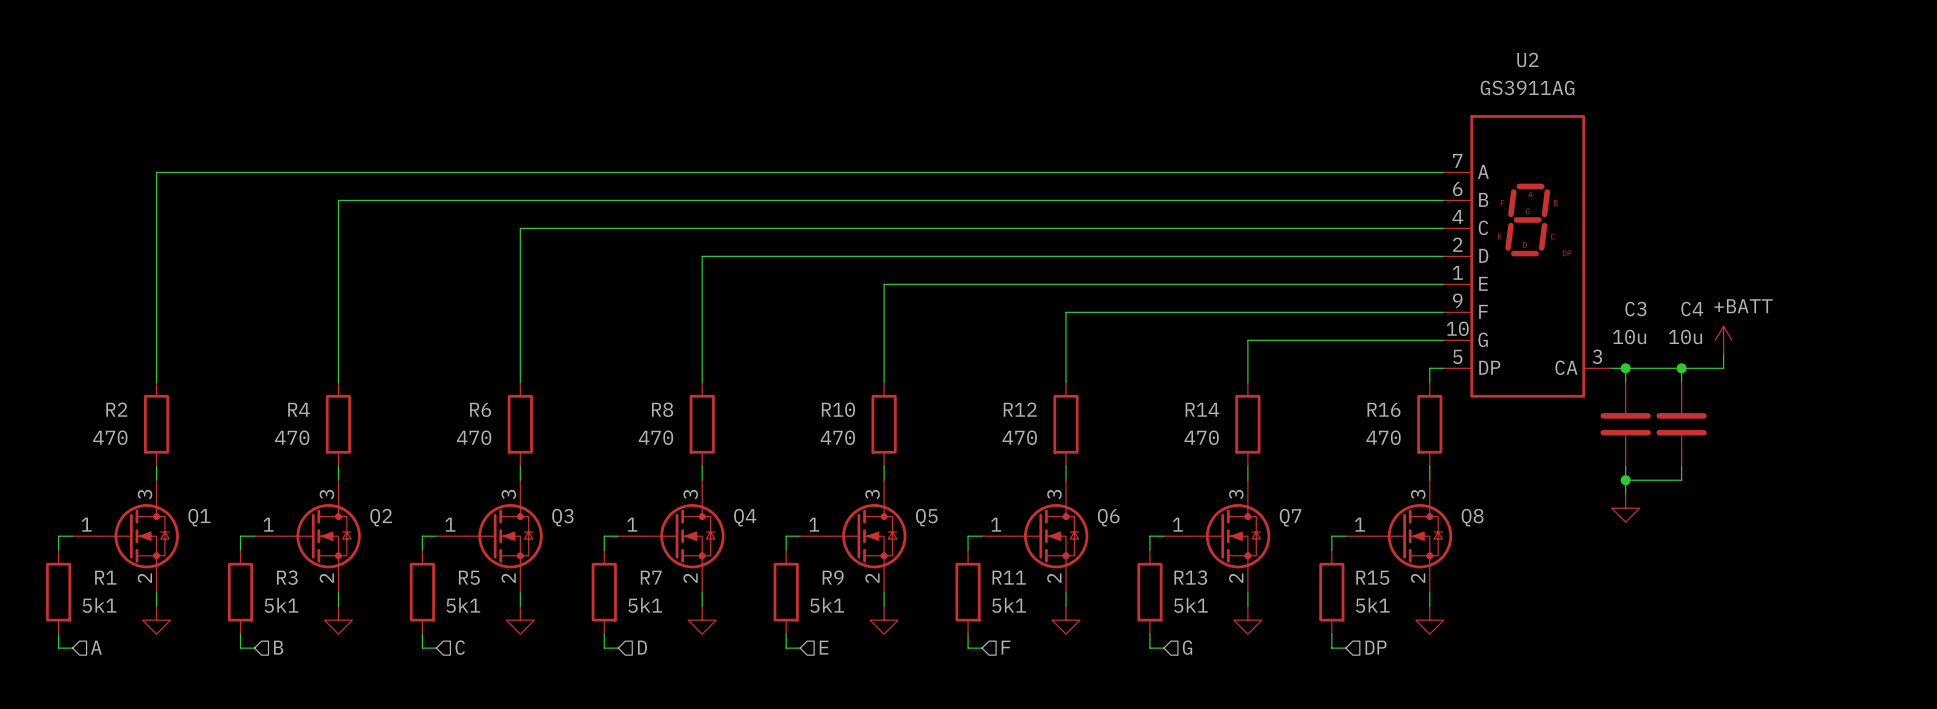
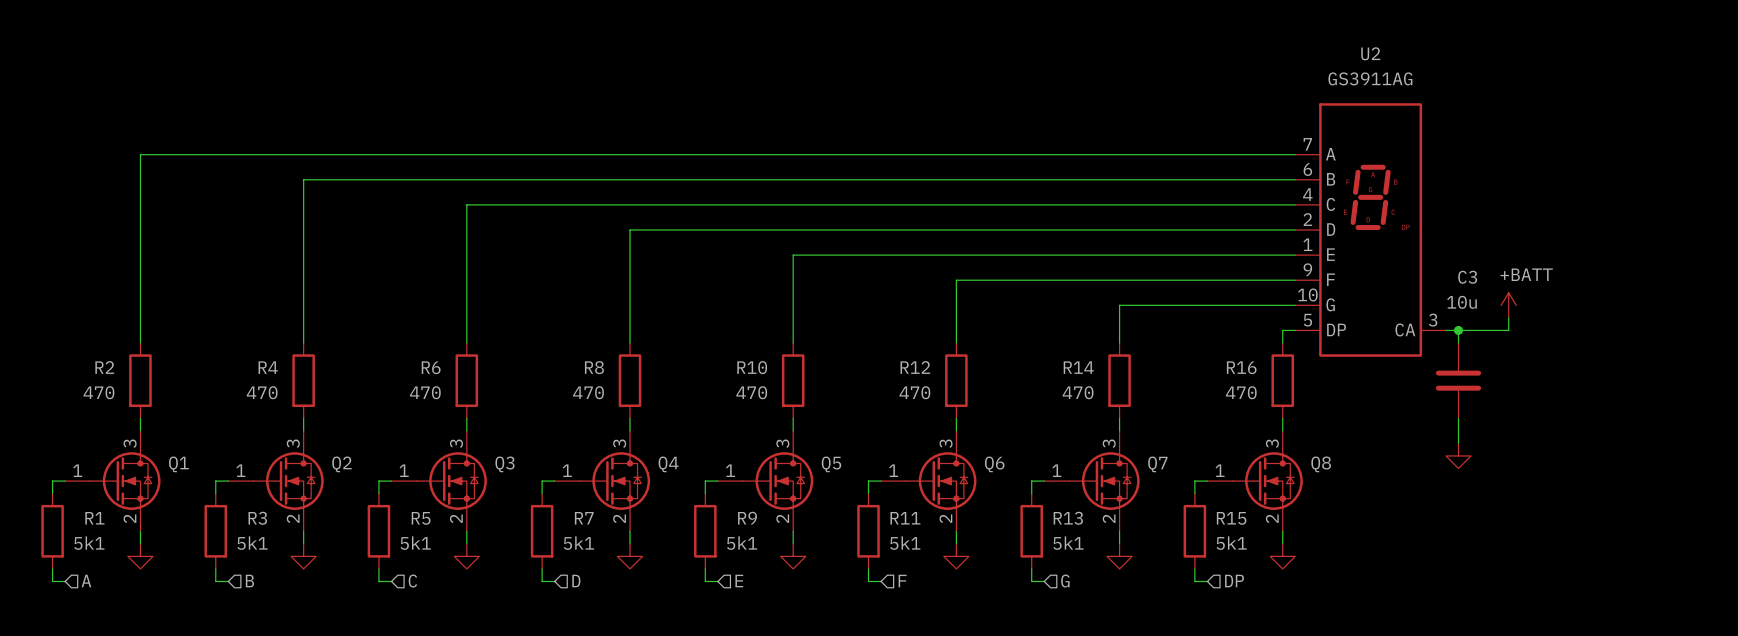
power symbol position: +BATT (1723, 340) -> +BATT (1508, 305)
wire: none -> (1508, 317) (1508, 330)
wire: (1723, 354) (1723, 368) (1681, 368) (1681, 382) -> none
junction: (1681, 368) -> none
C4: 10u (1681, 424) -> none
wire: (1681, 466) (1681, 480) (1625, 480) -> none
junction: (1625, 480) -> none

